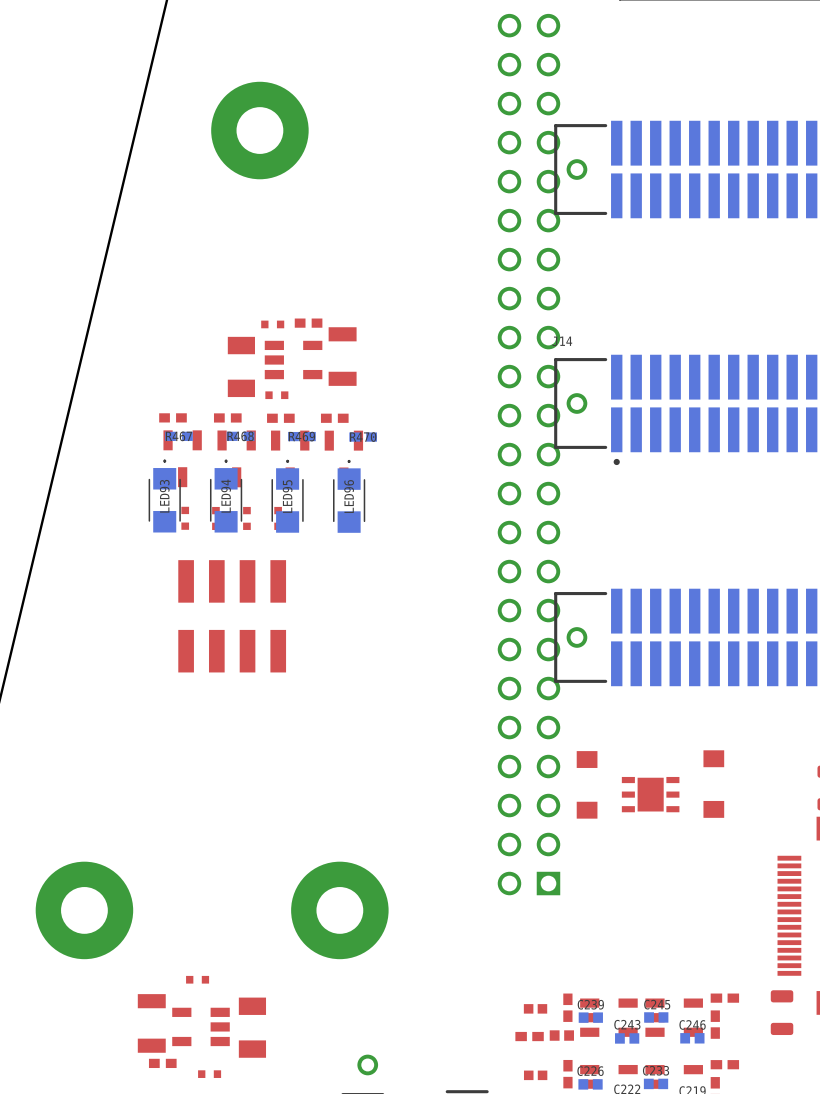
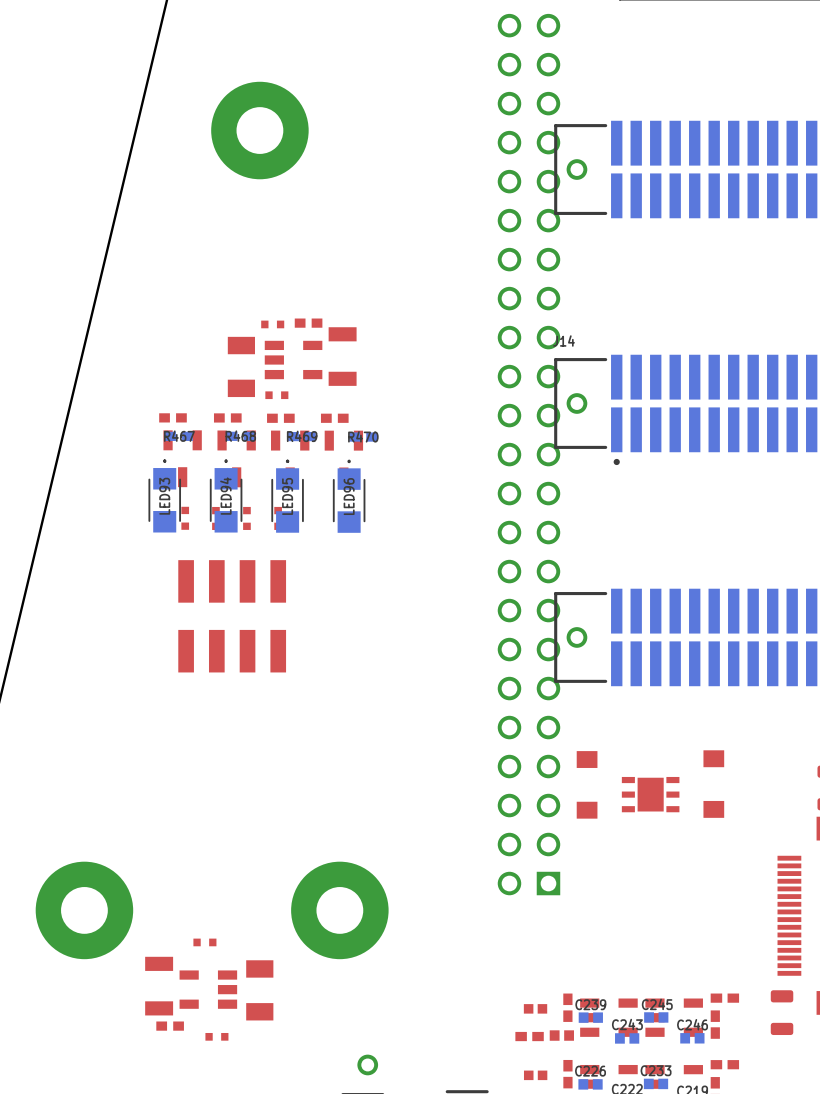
part: none -> (204, 942)
part footprint: [186, 975, 210, 984] -> [179, 970, 238, 1009]
part position: (151, 1023) -> (159, 986)
part: (201, 1026) -> none
part position: (252, 1027) -> (259, 990)
part position: (162, 1063) -> (170, 1026)
part position: (209, 1074) -> (216, 1036)

